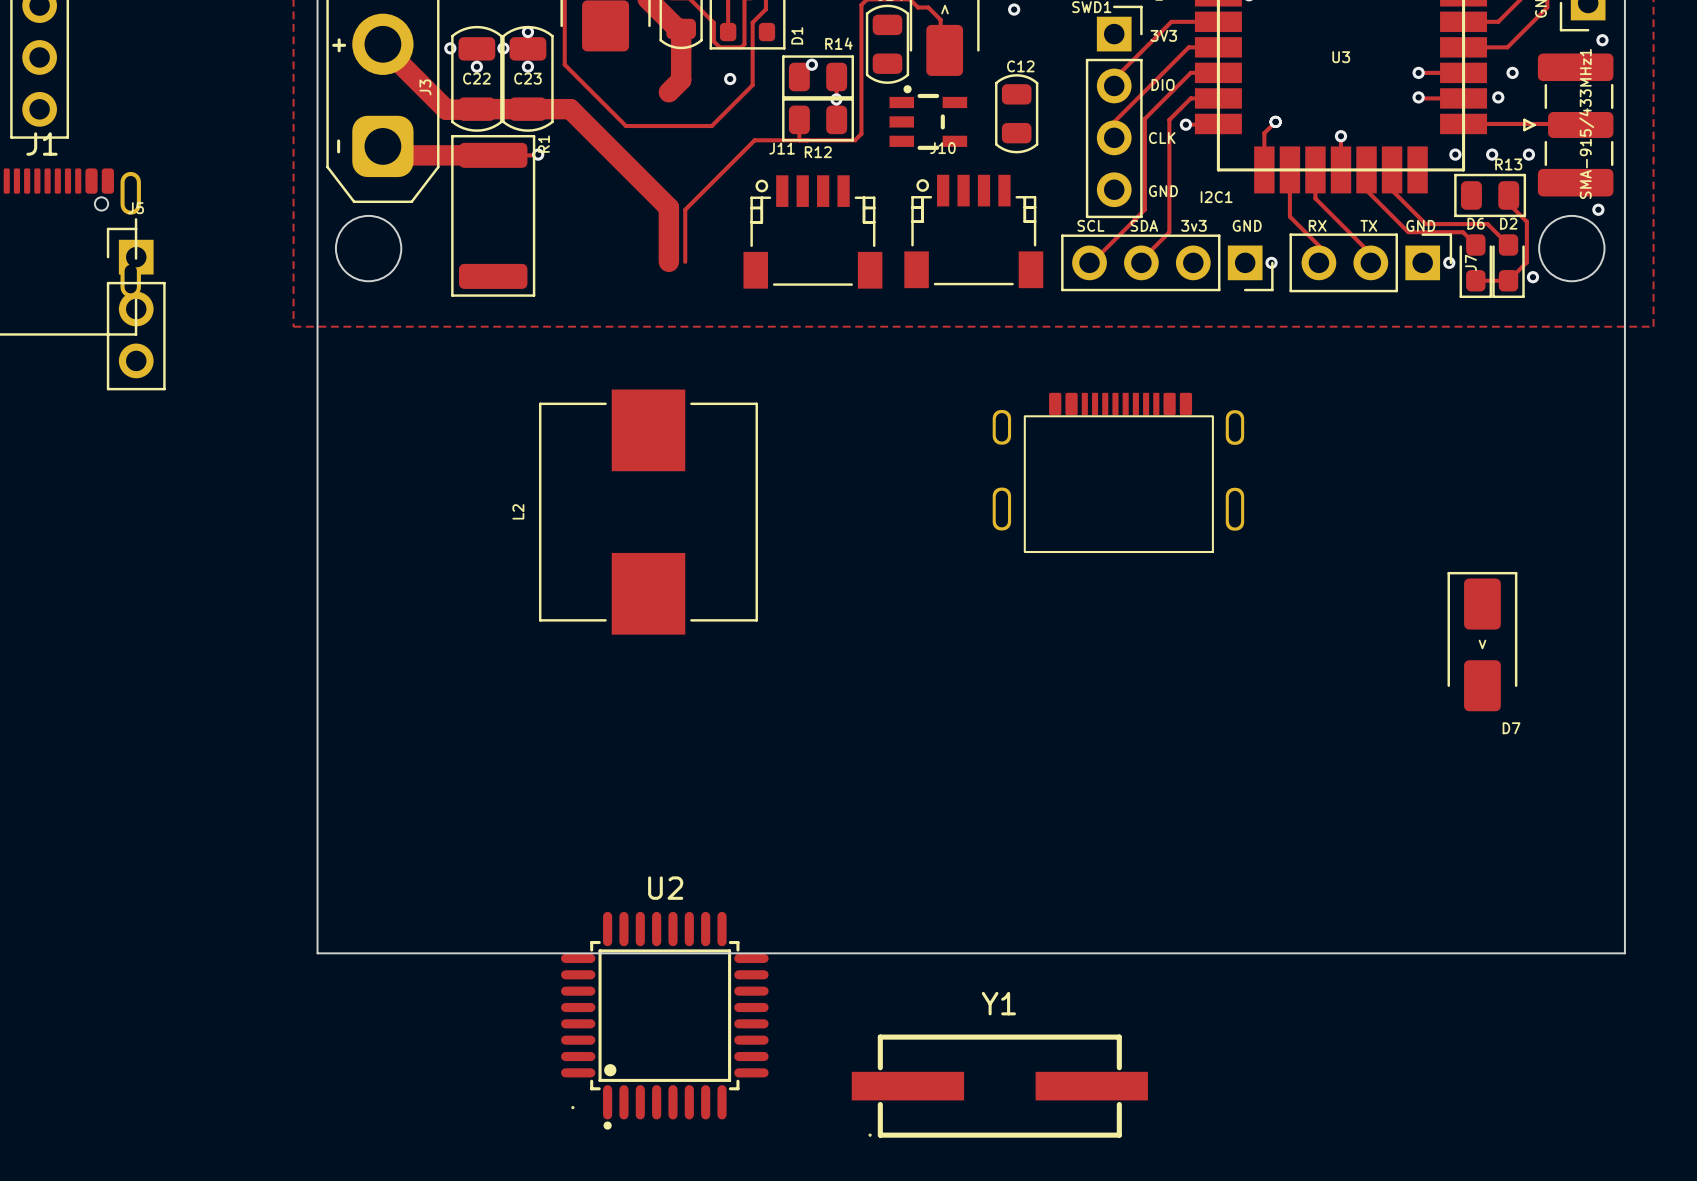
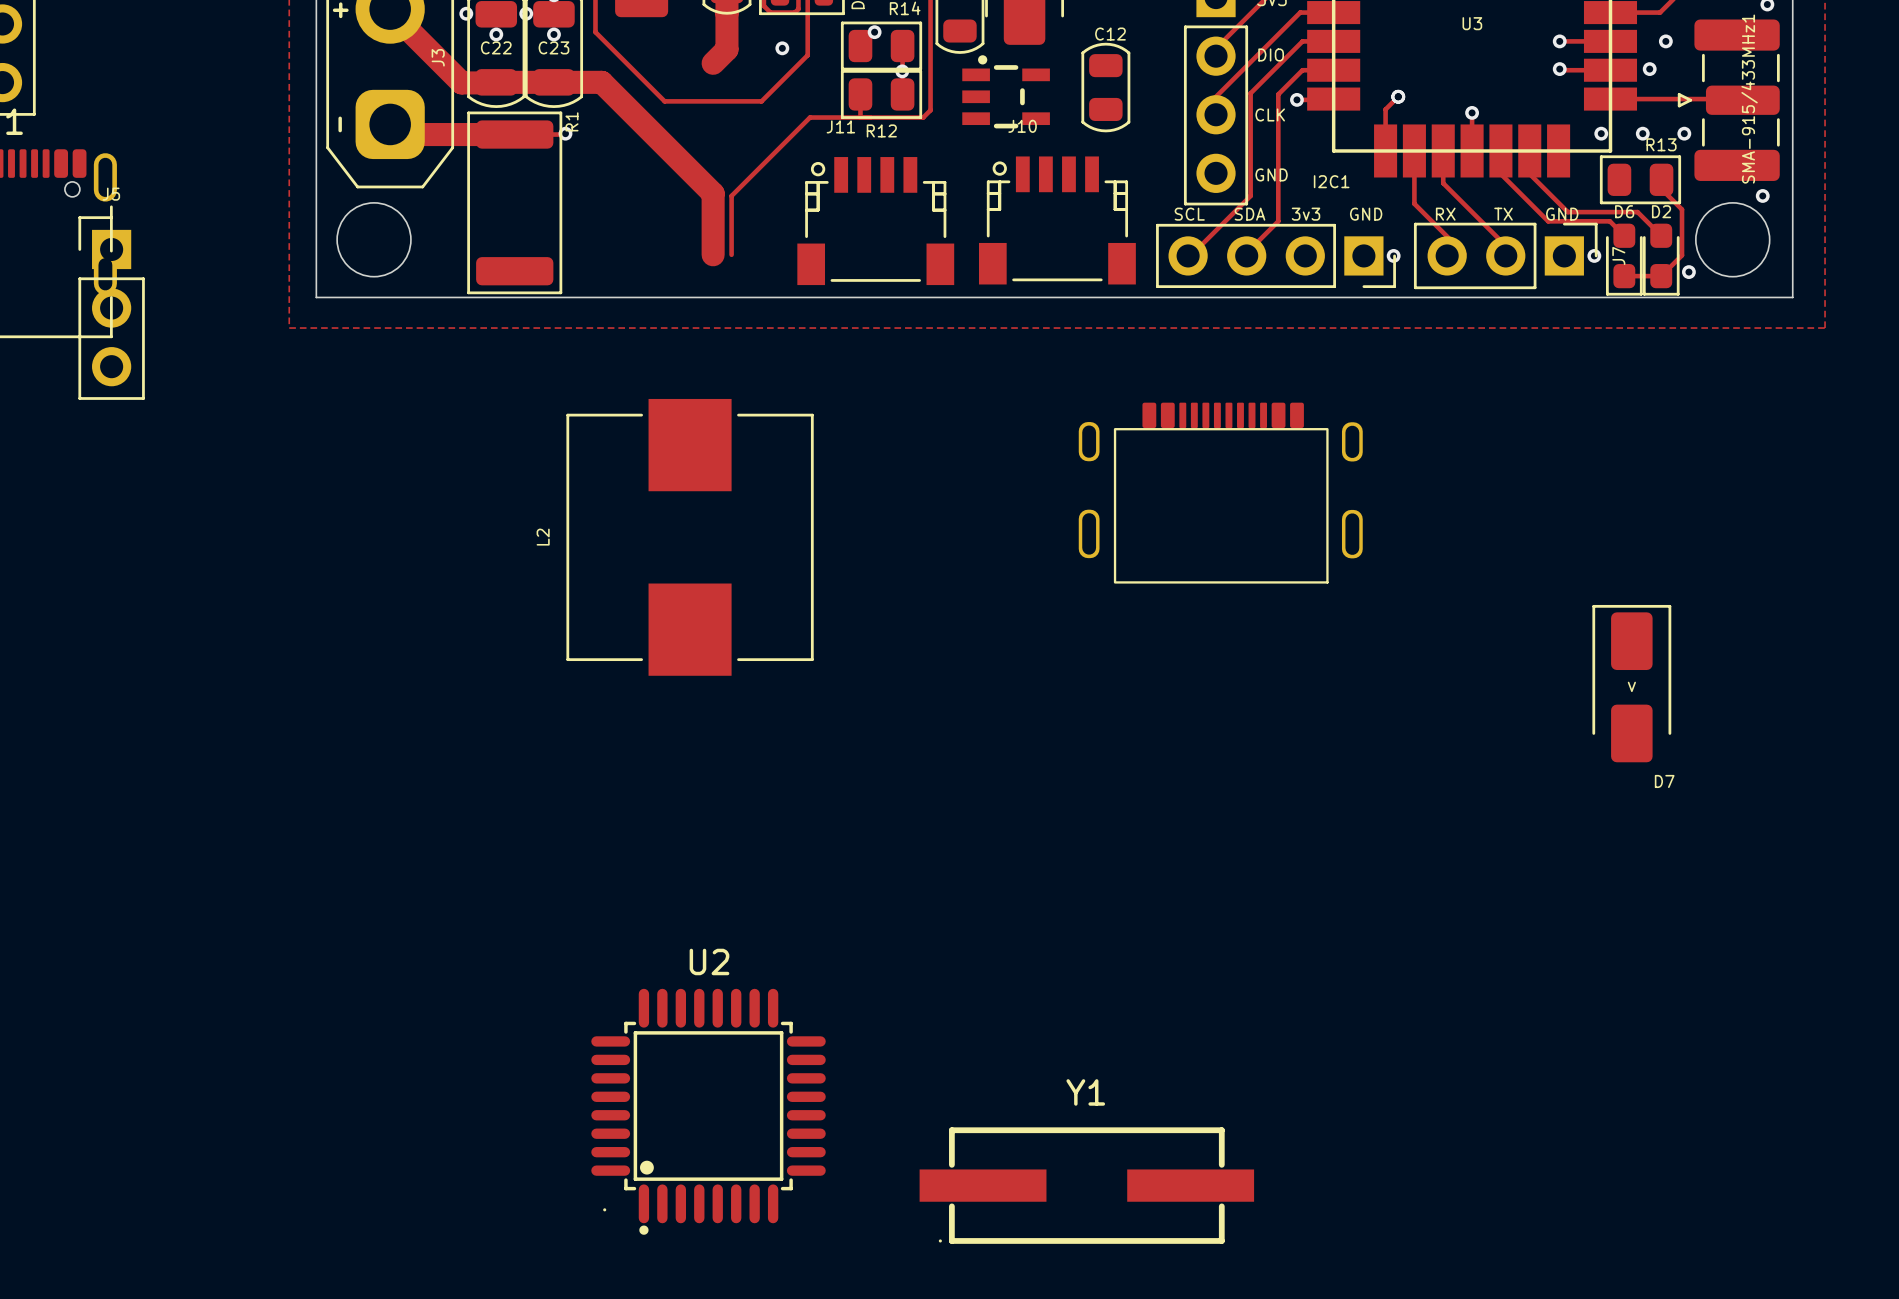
board edge: (317, 299) (317, 953) (1624, 953) (1624, 299) -> (316, 297) (1792, 297)

